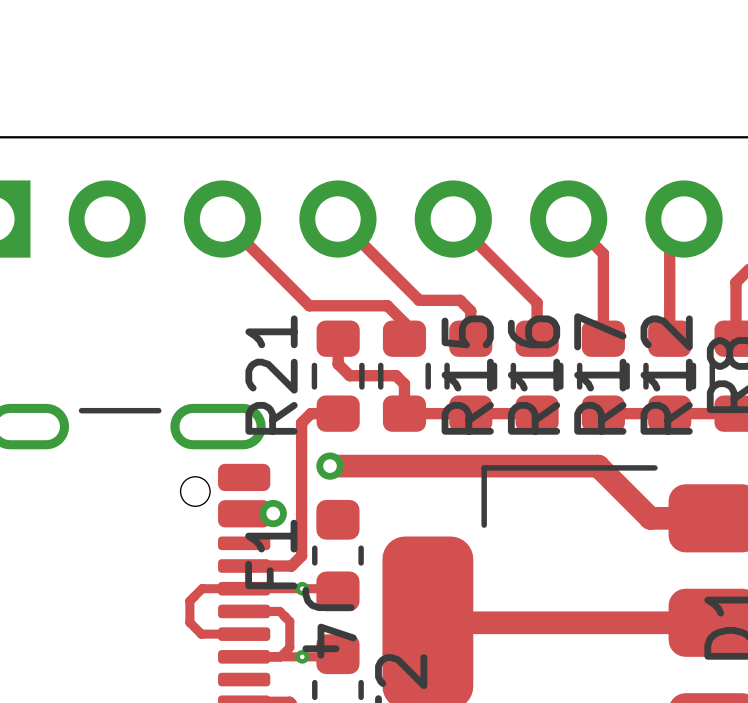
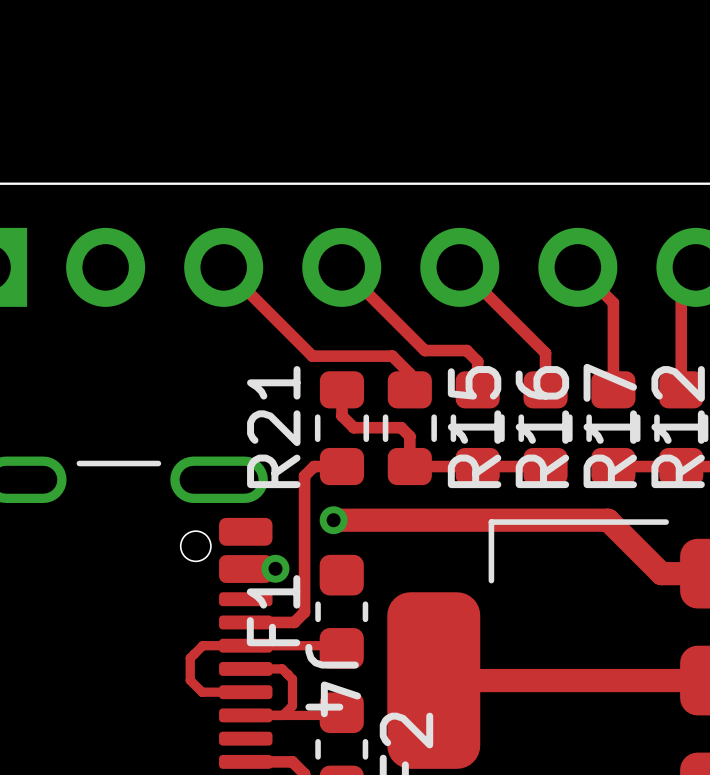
via: (302, 588) -> none
via: (302, 656) -> none

